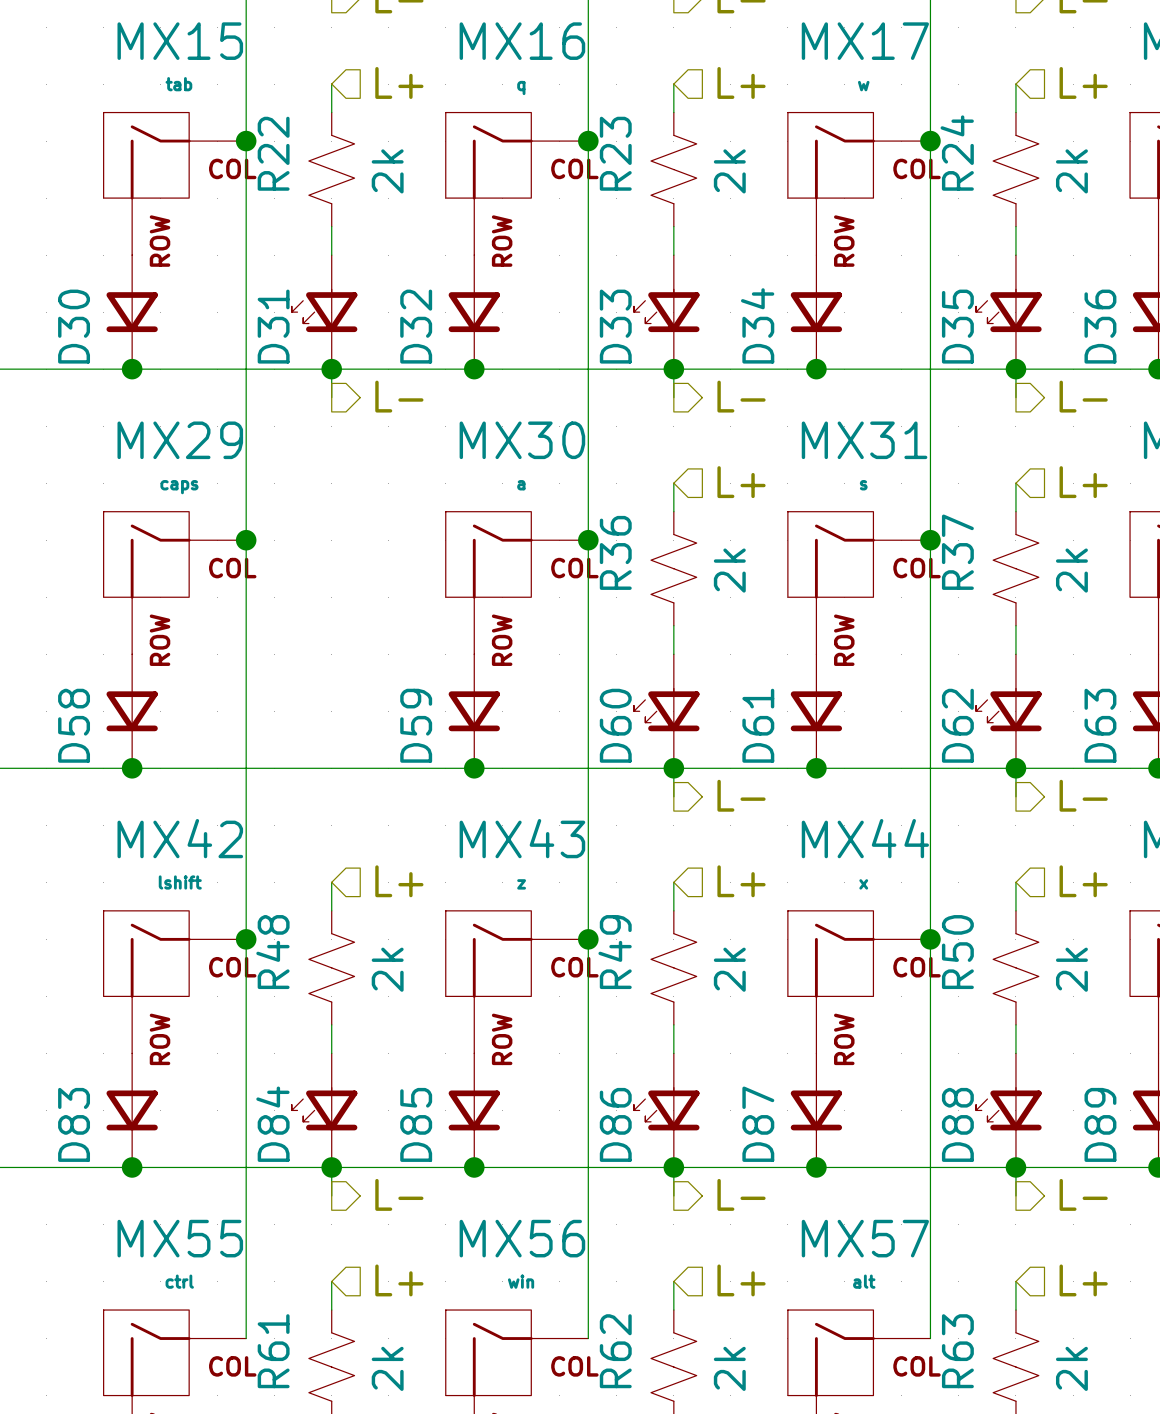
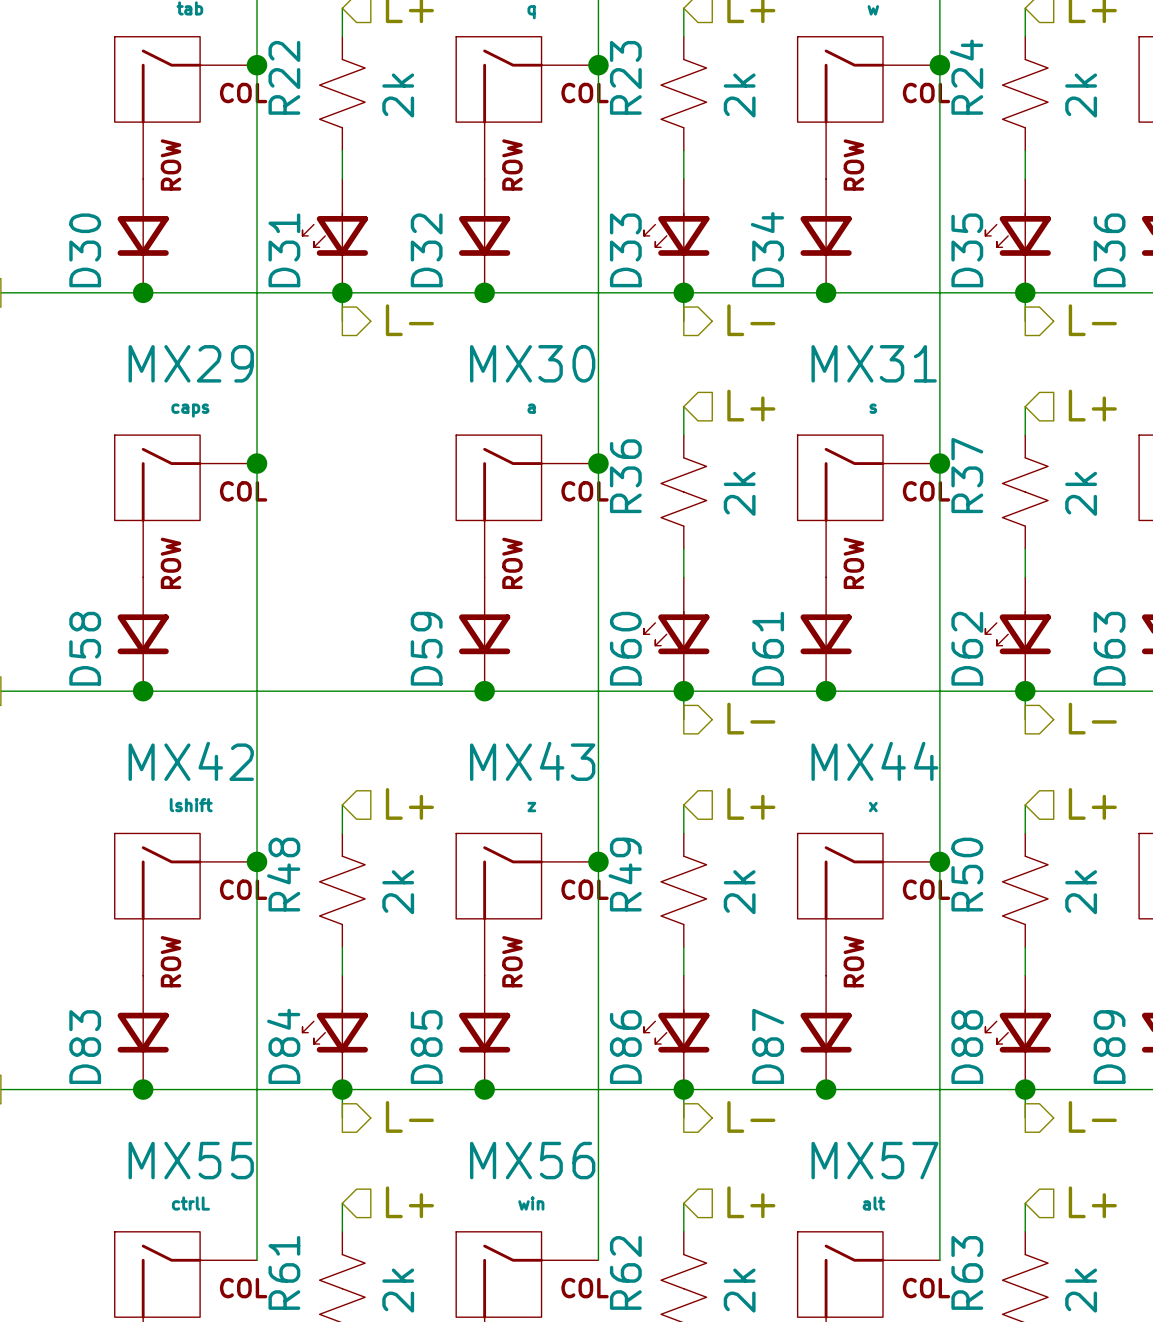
MX55 value: ctrl (179, 1281) -> ctrlL (190, 1203)

